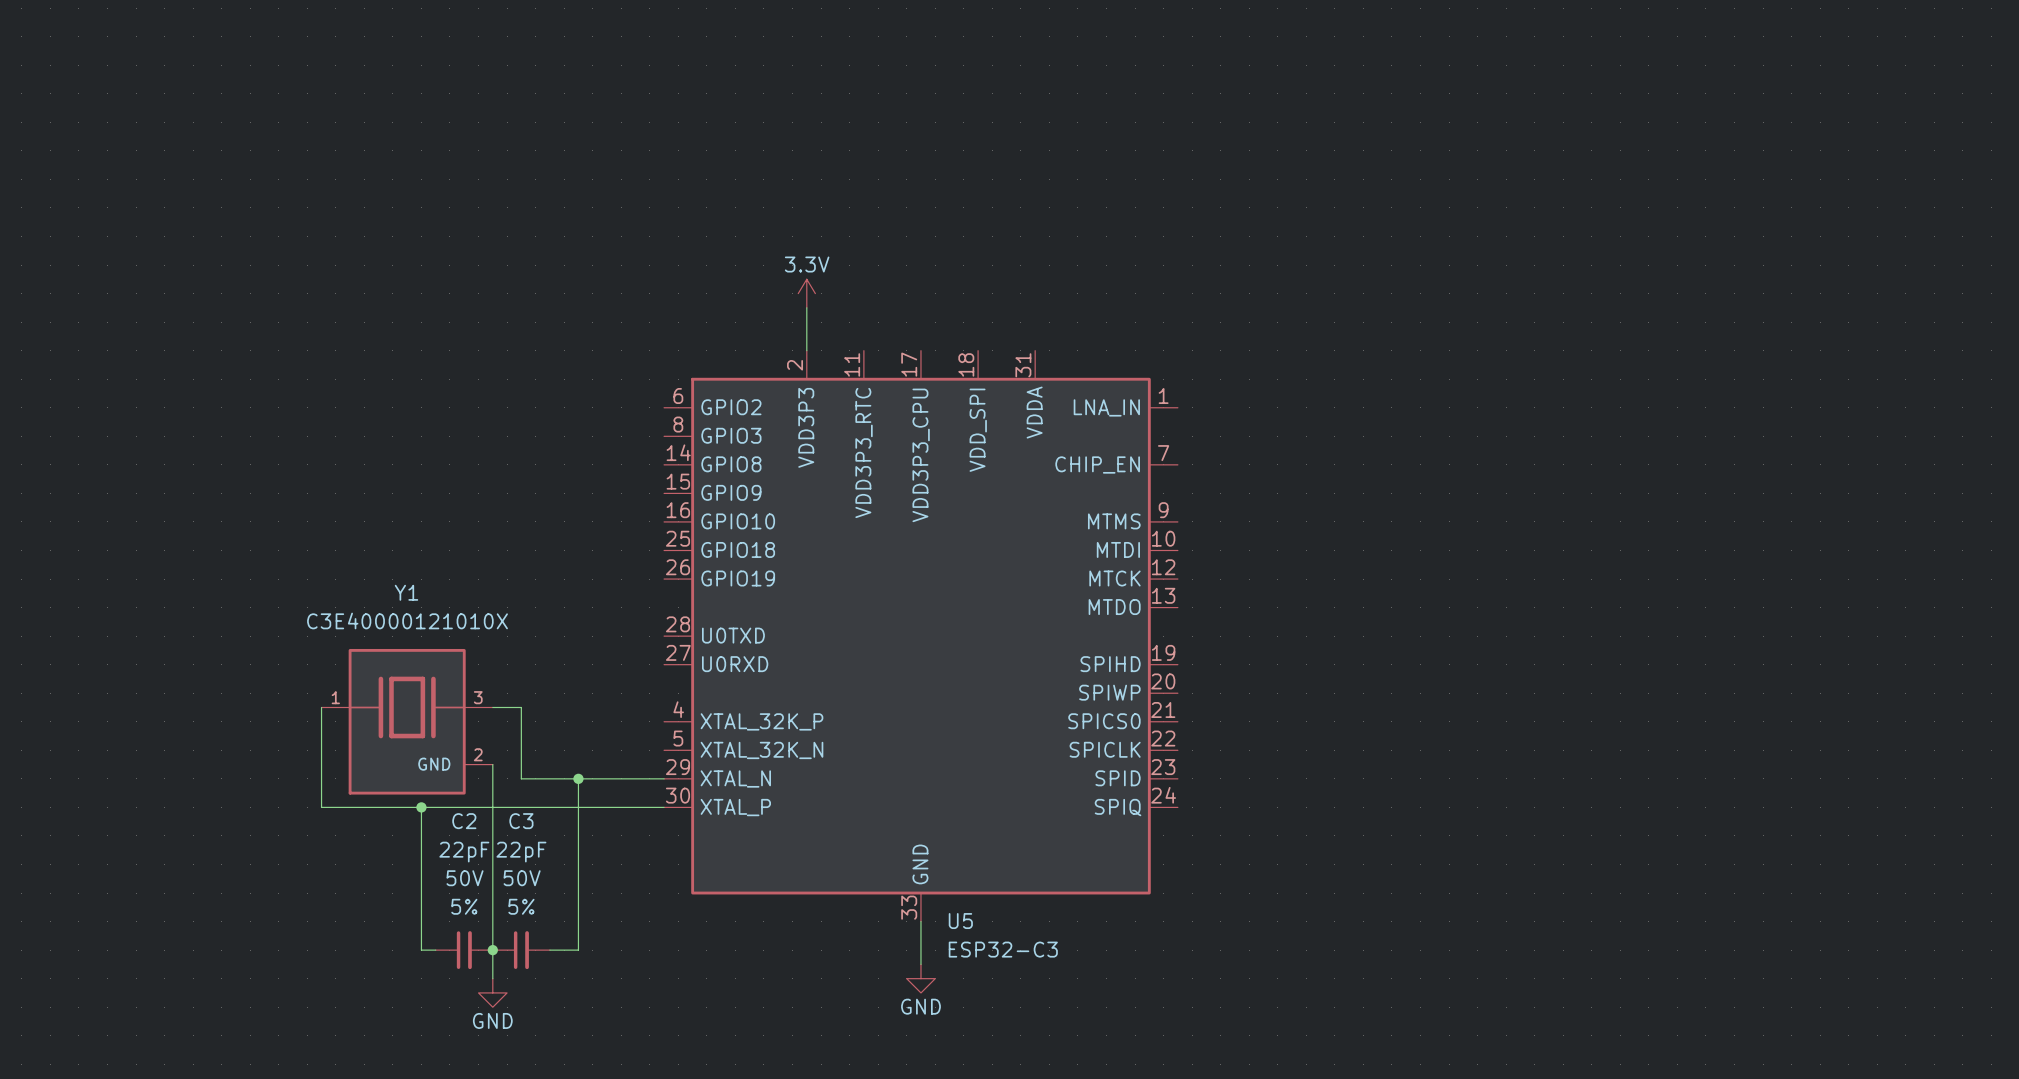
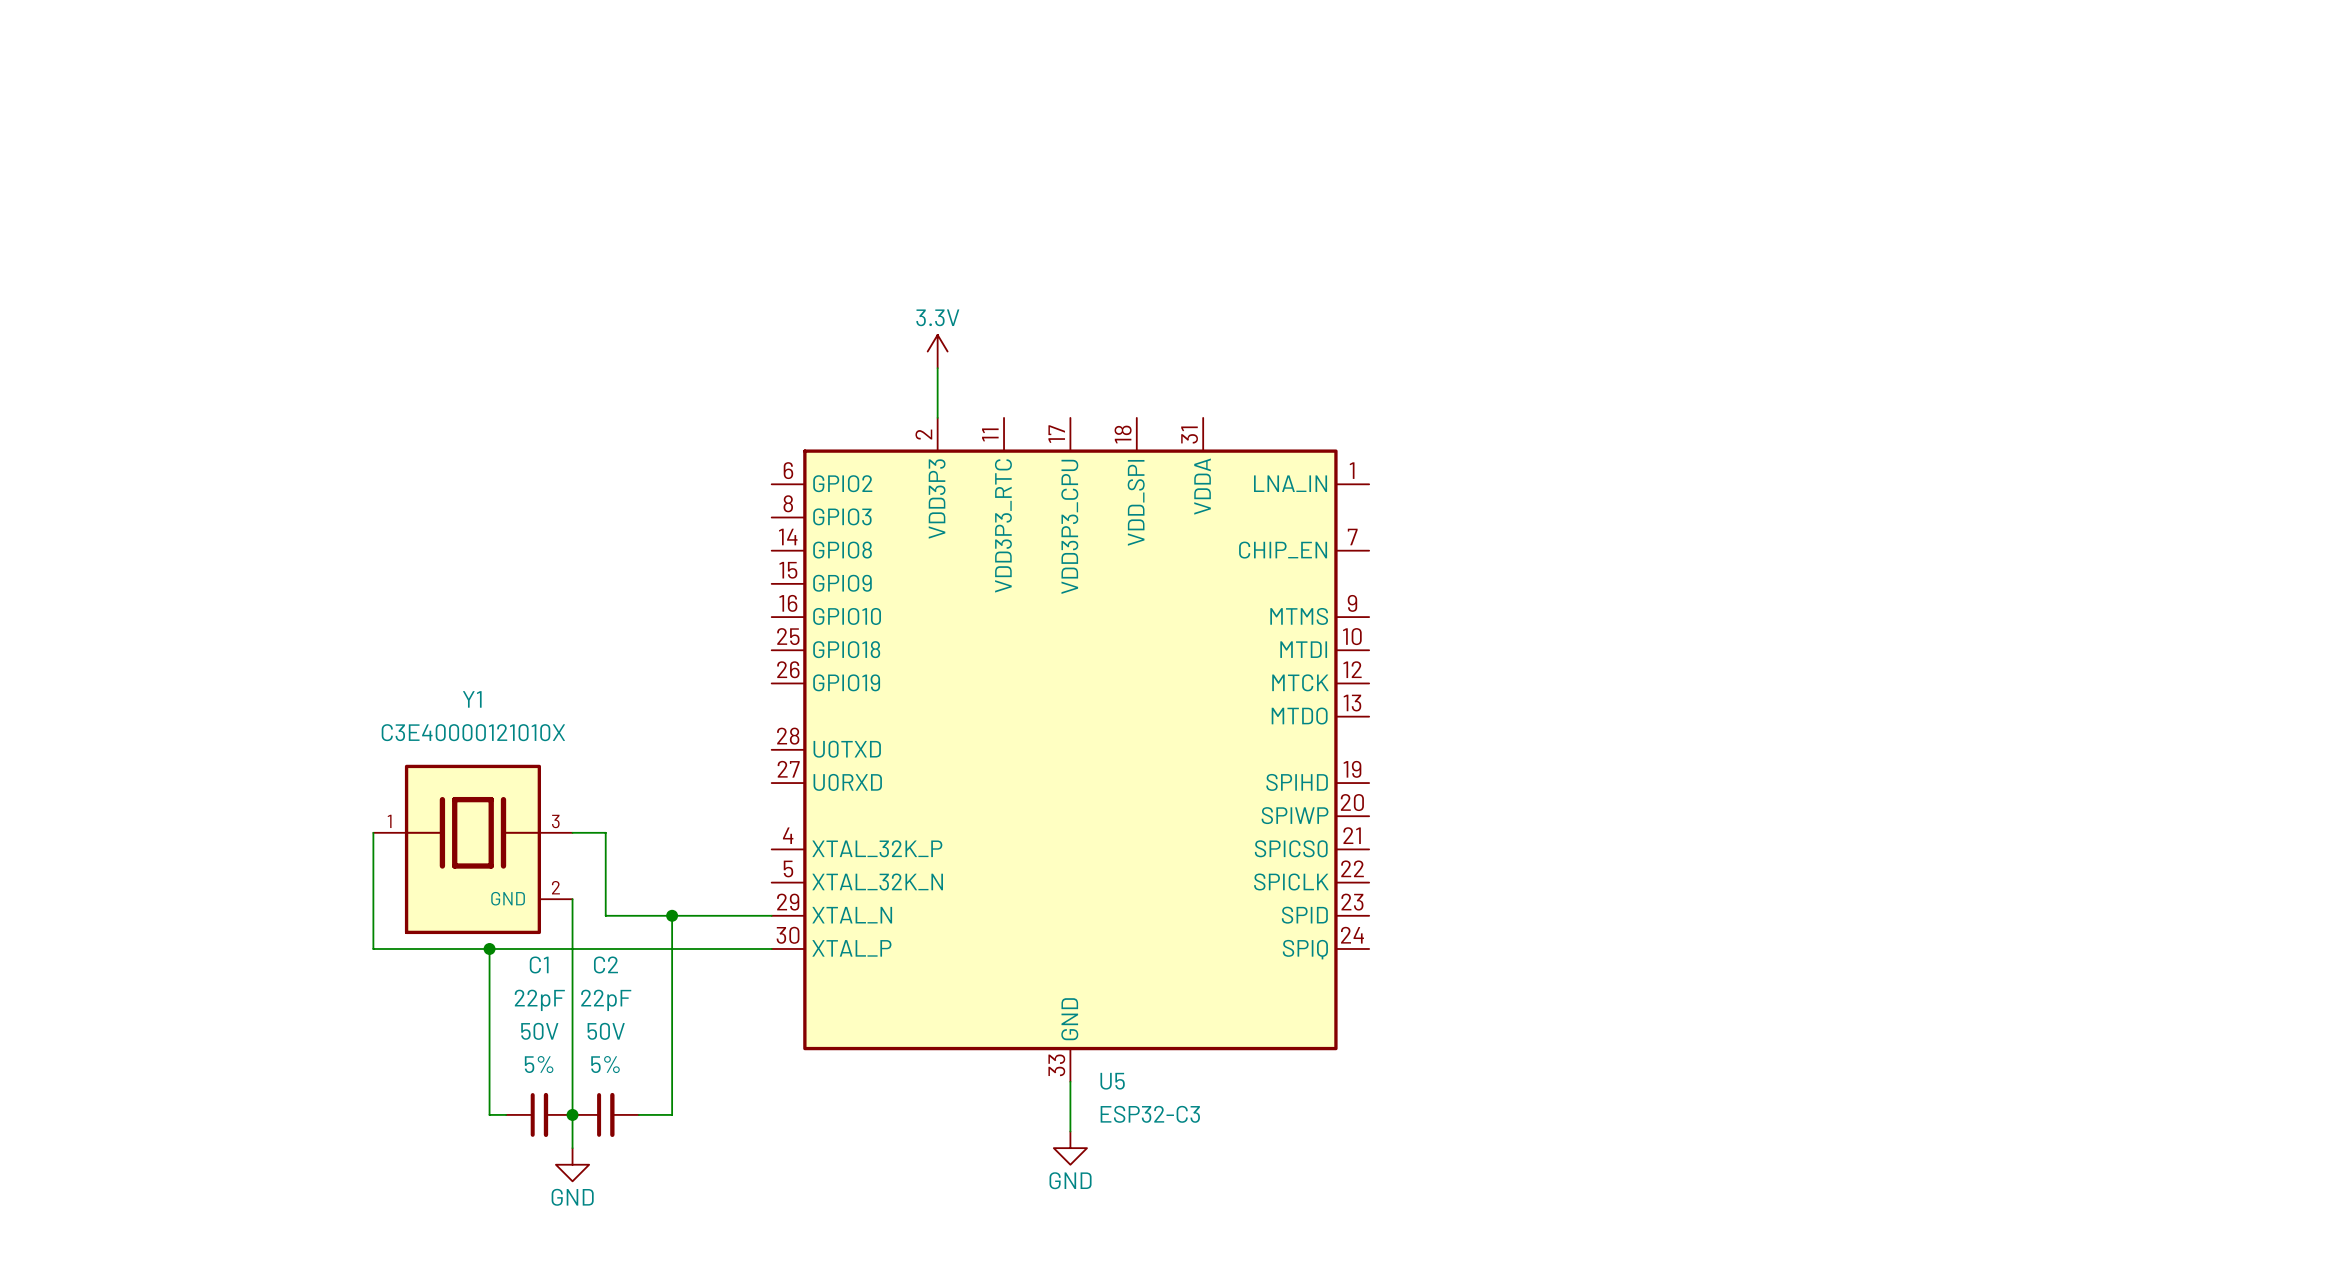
C2 name: C2 (464, 821) -> C1 (539, 964)
C3 name: C3 (521, 821) -> C2 (605, 964)

